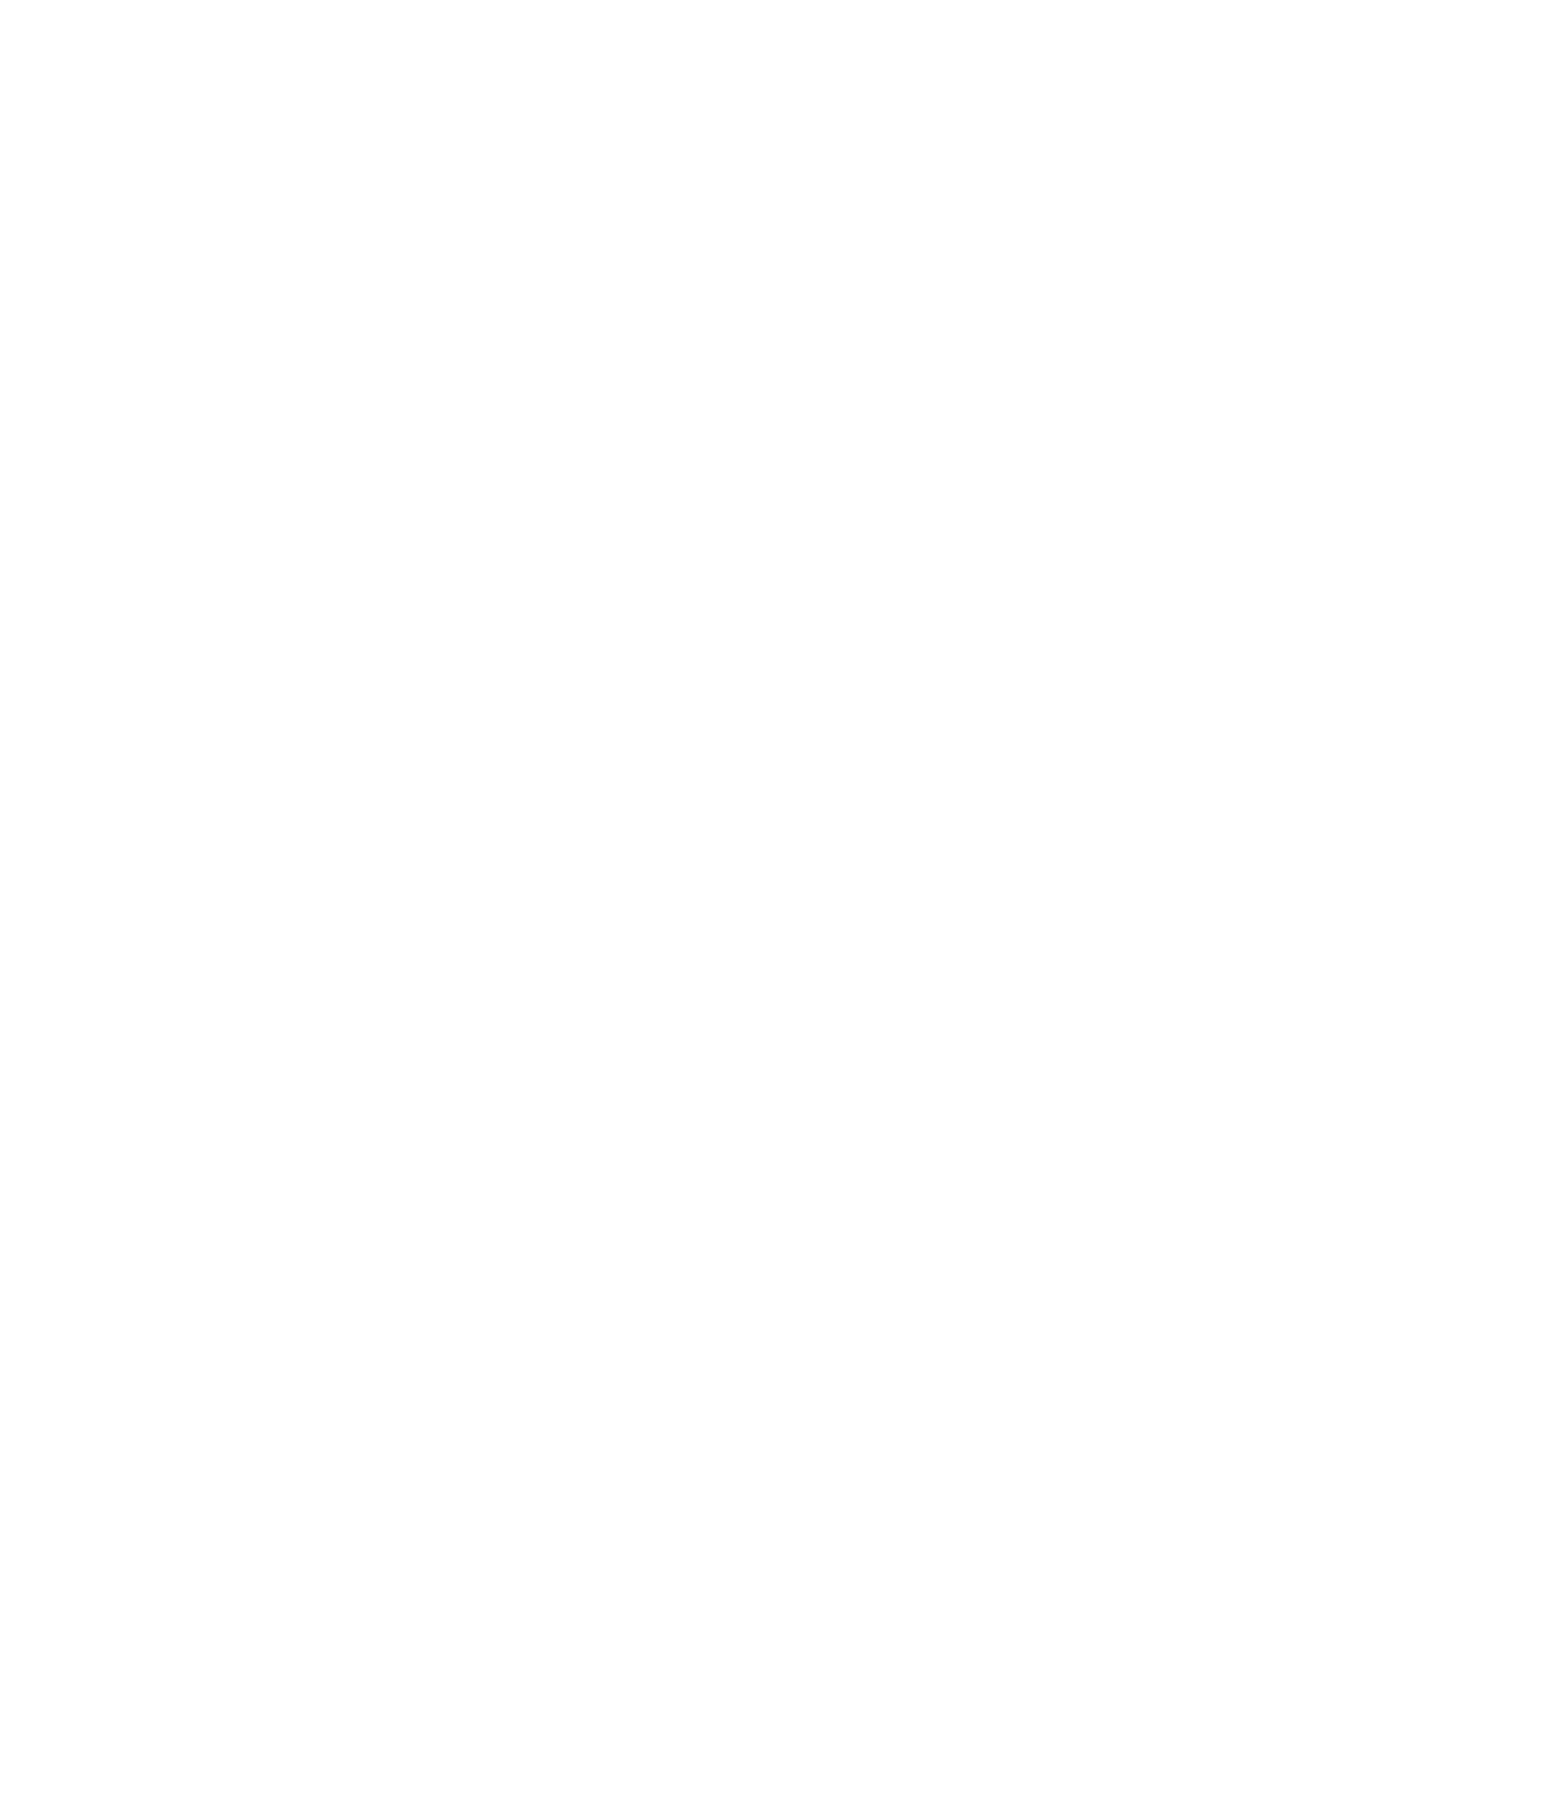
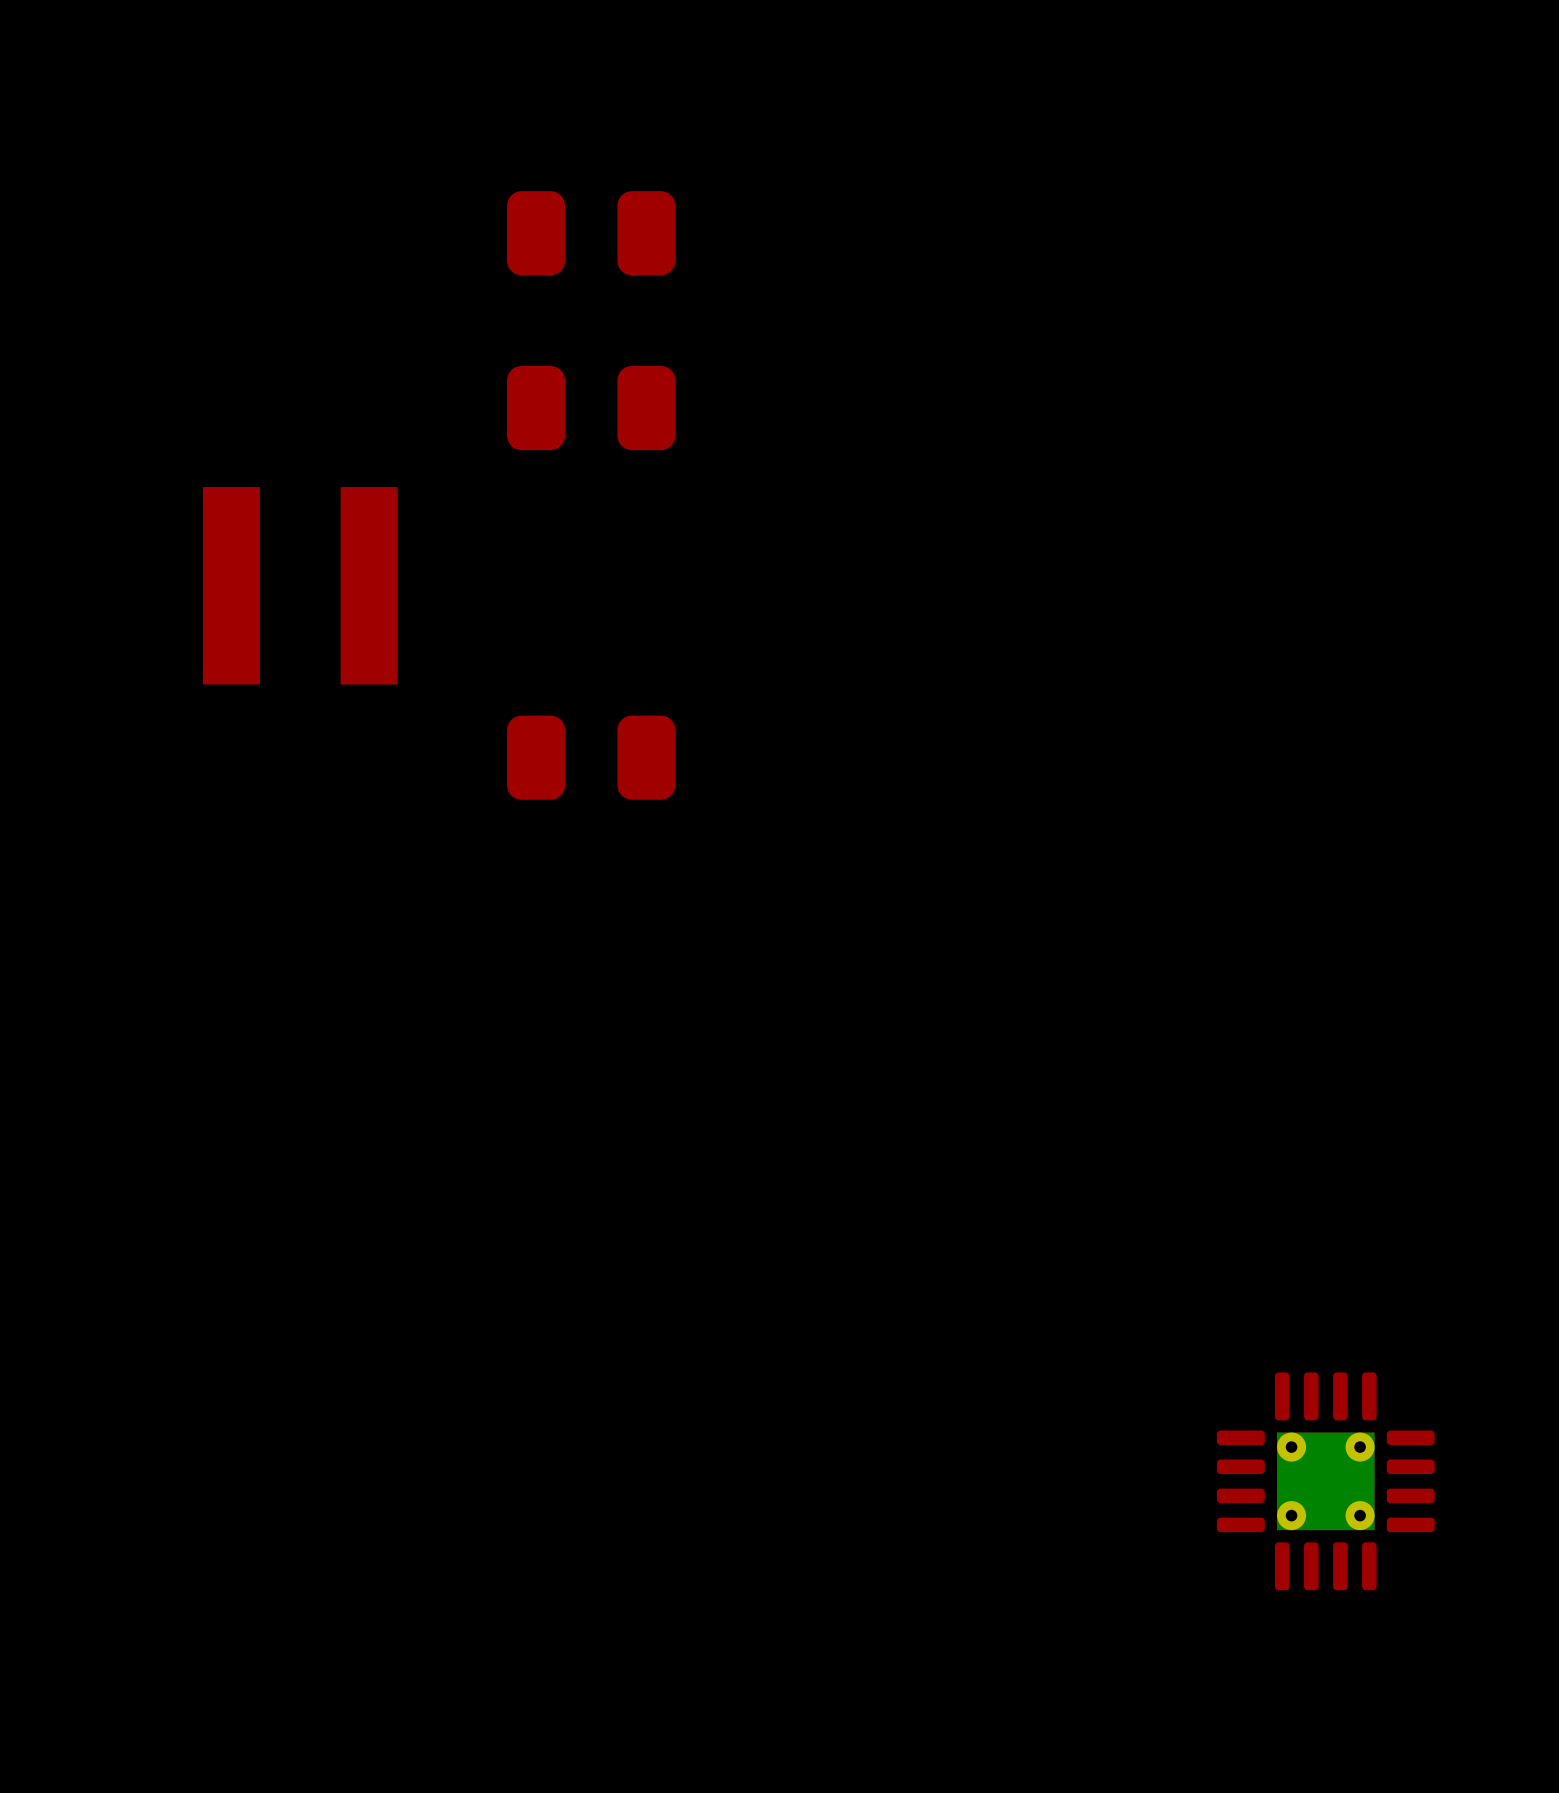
part: none -> (591, 233)
part: none -> (591, 408)
part: none -> (300, 585)
part: none -> (591, 757)
part: none -> (1325, 1481)

